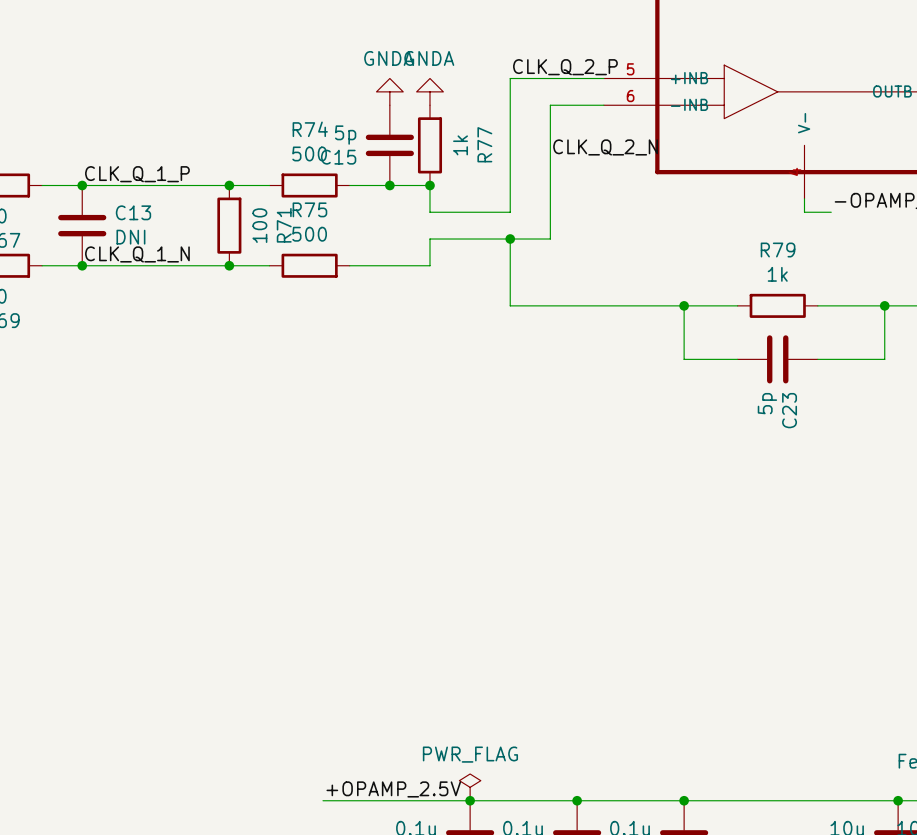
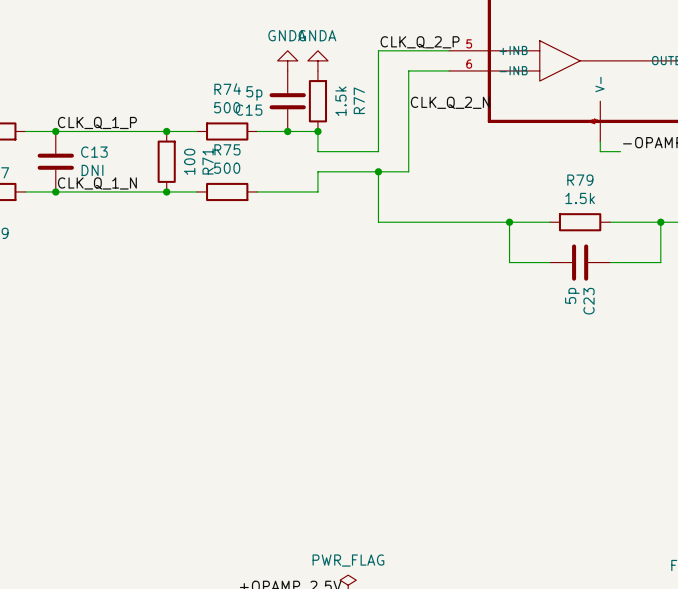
R77 value: 1k (460, 145) -> 1.5k (340, 101)
R79 value: 1k (777, 274) -> 1.5k (580, 198)

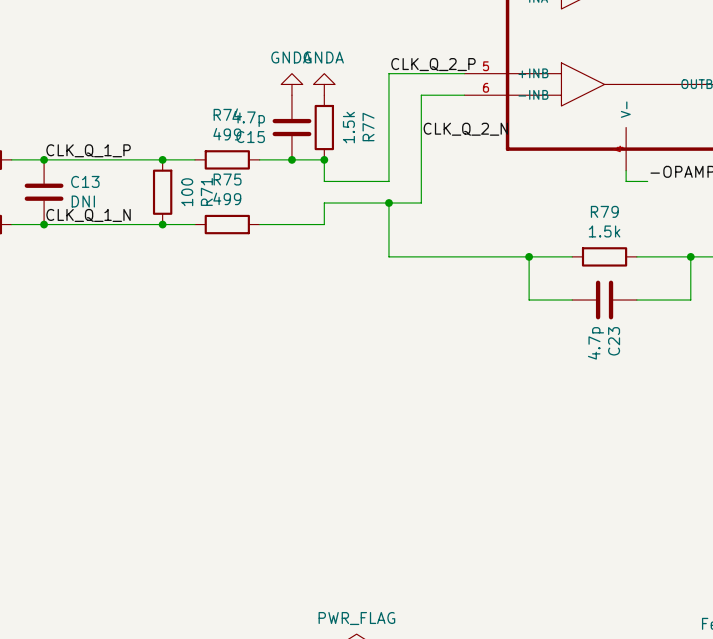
C15 value: 5p (254, 93) -> 4.7p (248, 118)
R74 value: 500 (227, 107) -> 499 (227, 134)
R75 value: 500 (227, 168) -> 499 (227, 198)
C23 value: 5p (572, 295) -> 4.7p (595, 343)

